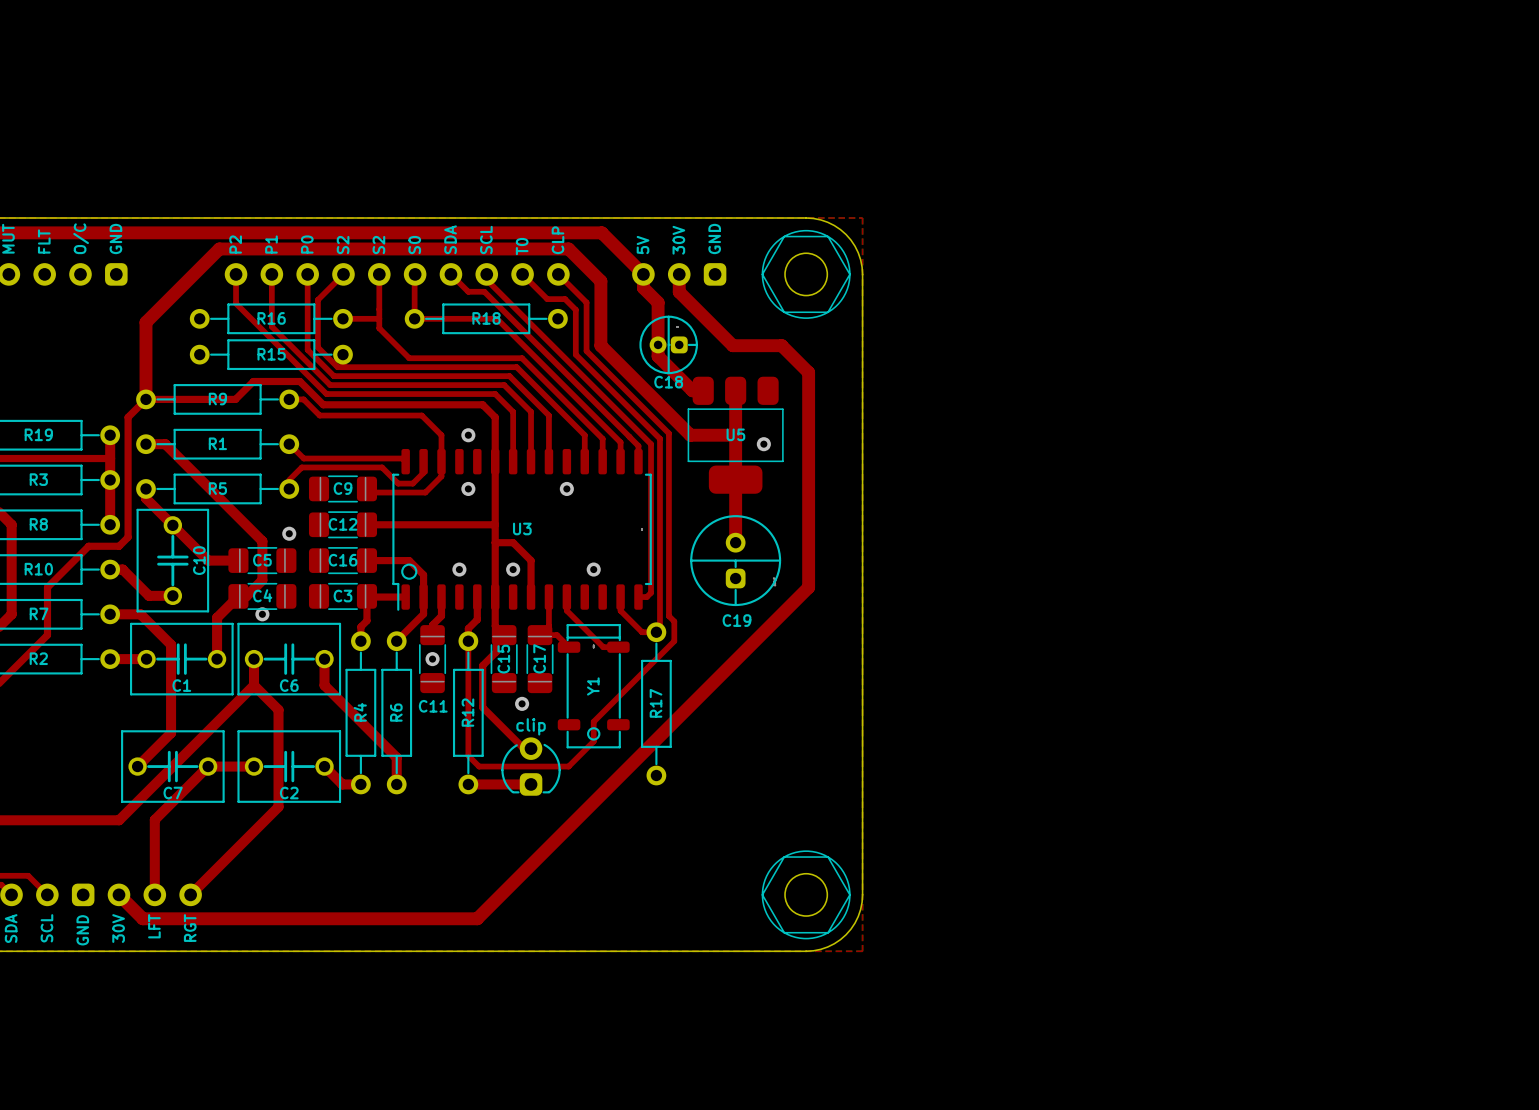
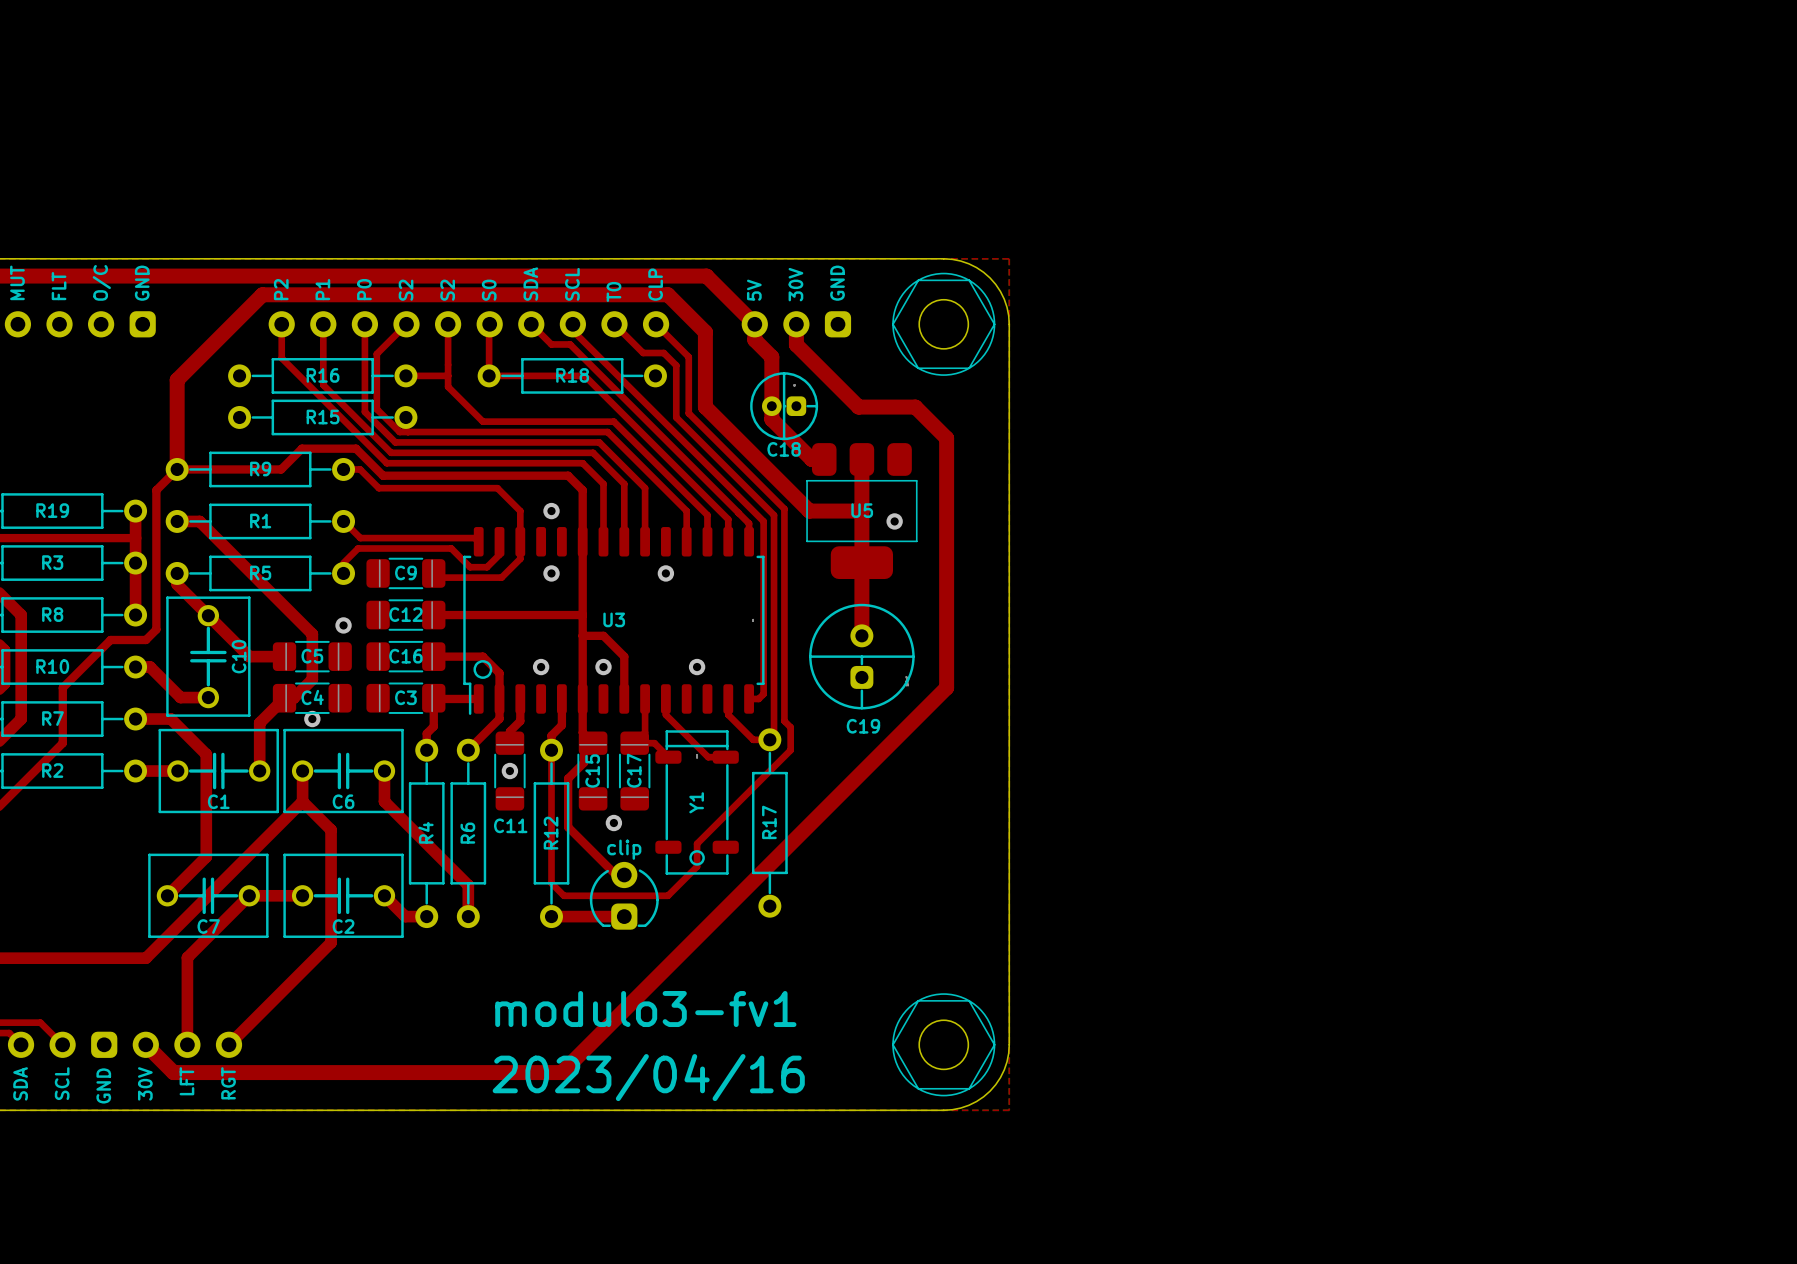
text: none -> modulo3-fv1 (645, 1009)
text: none -> 2023/04/16 (648, 1077)

